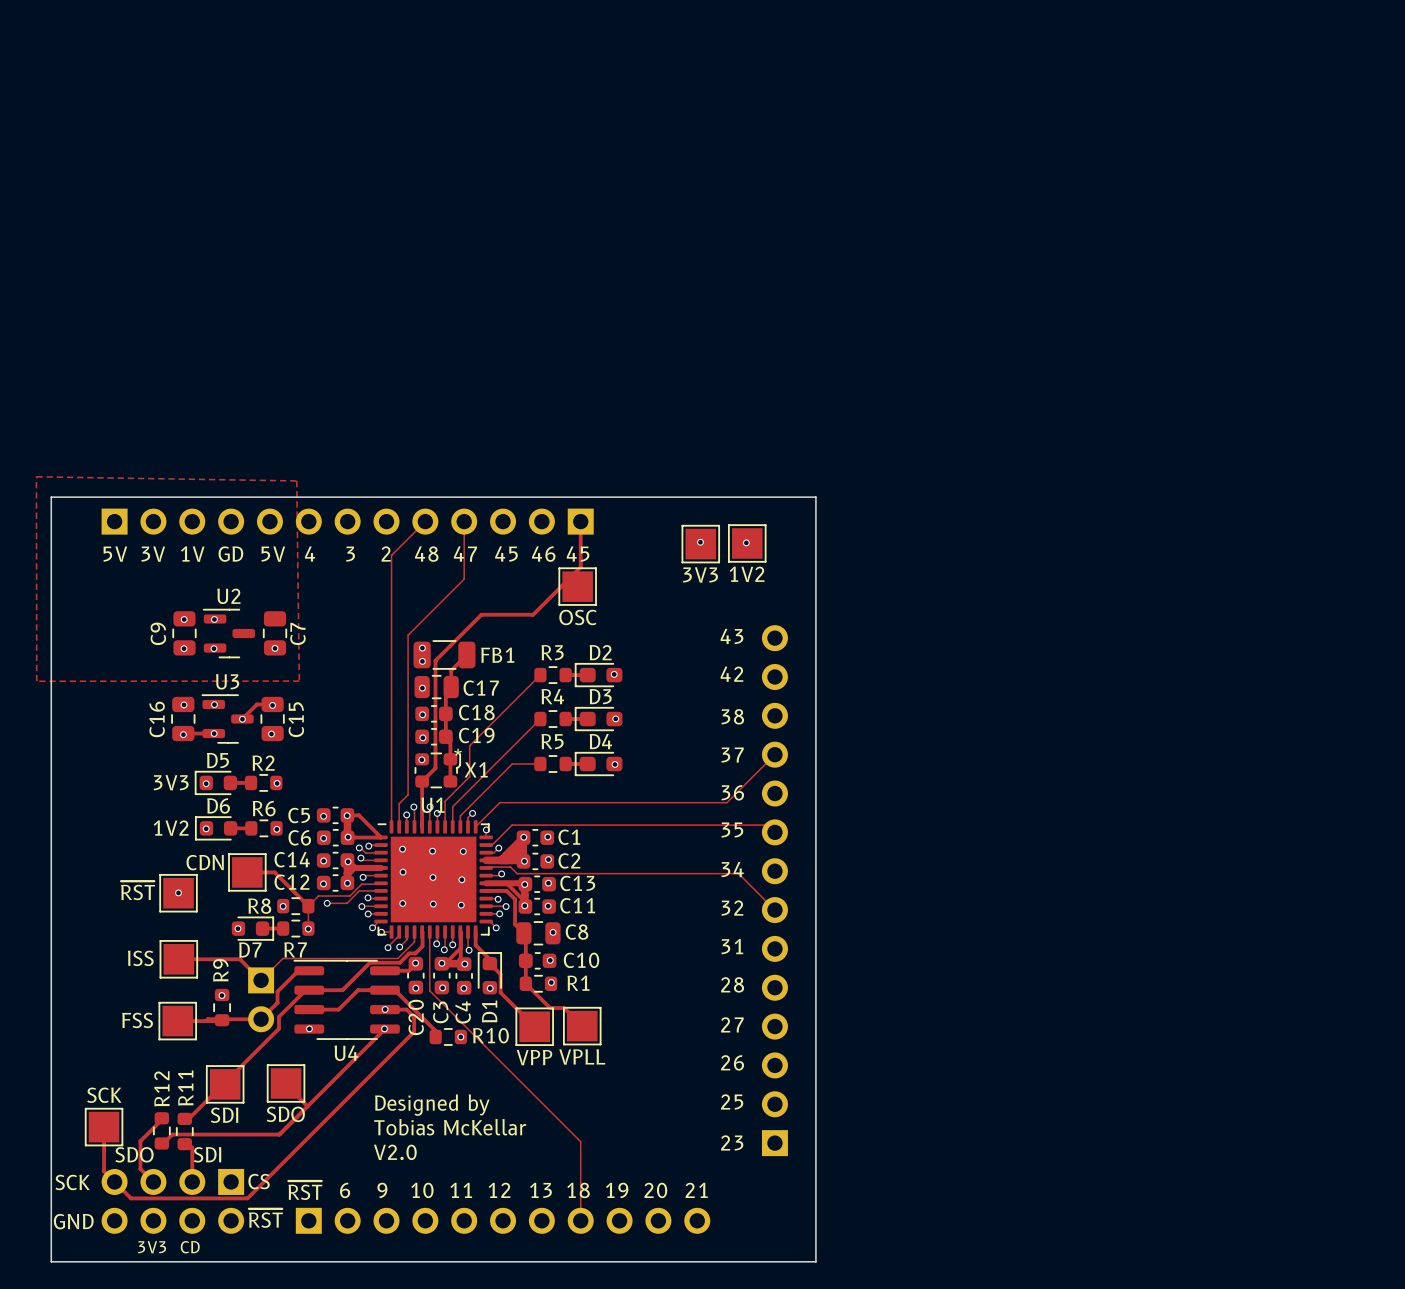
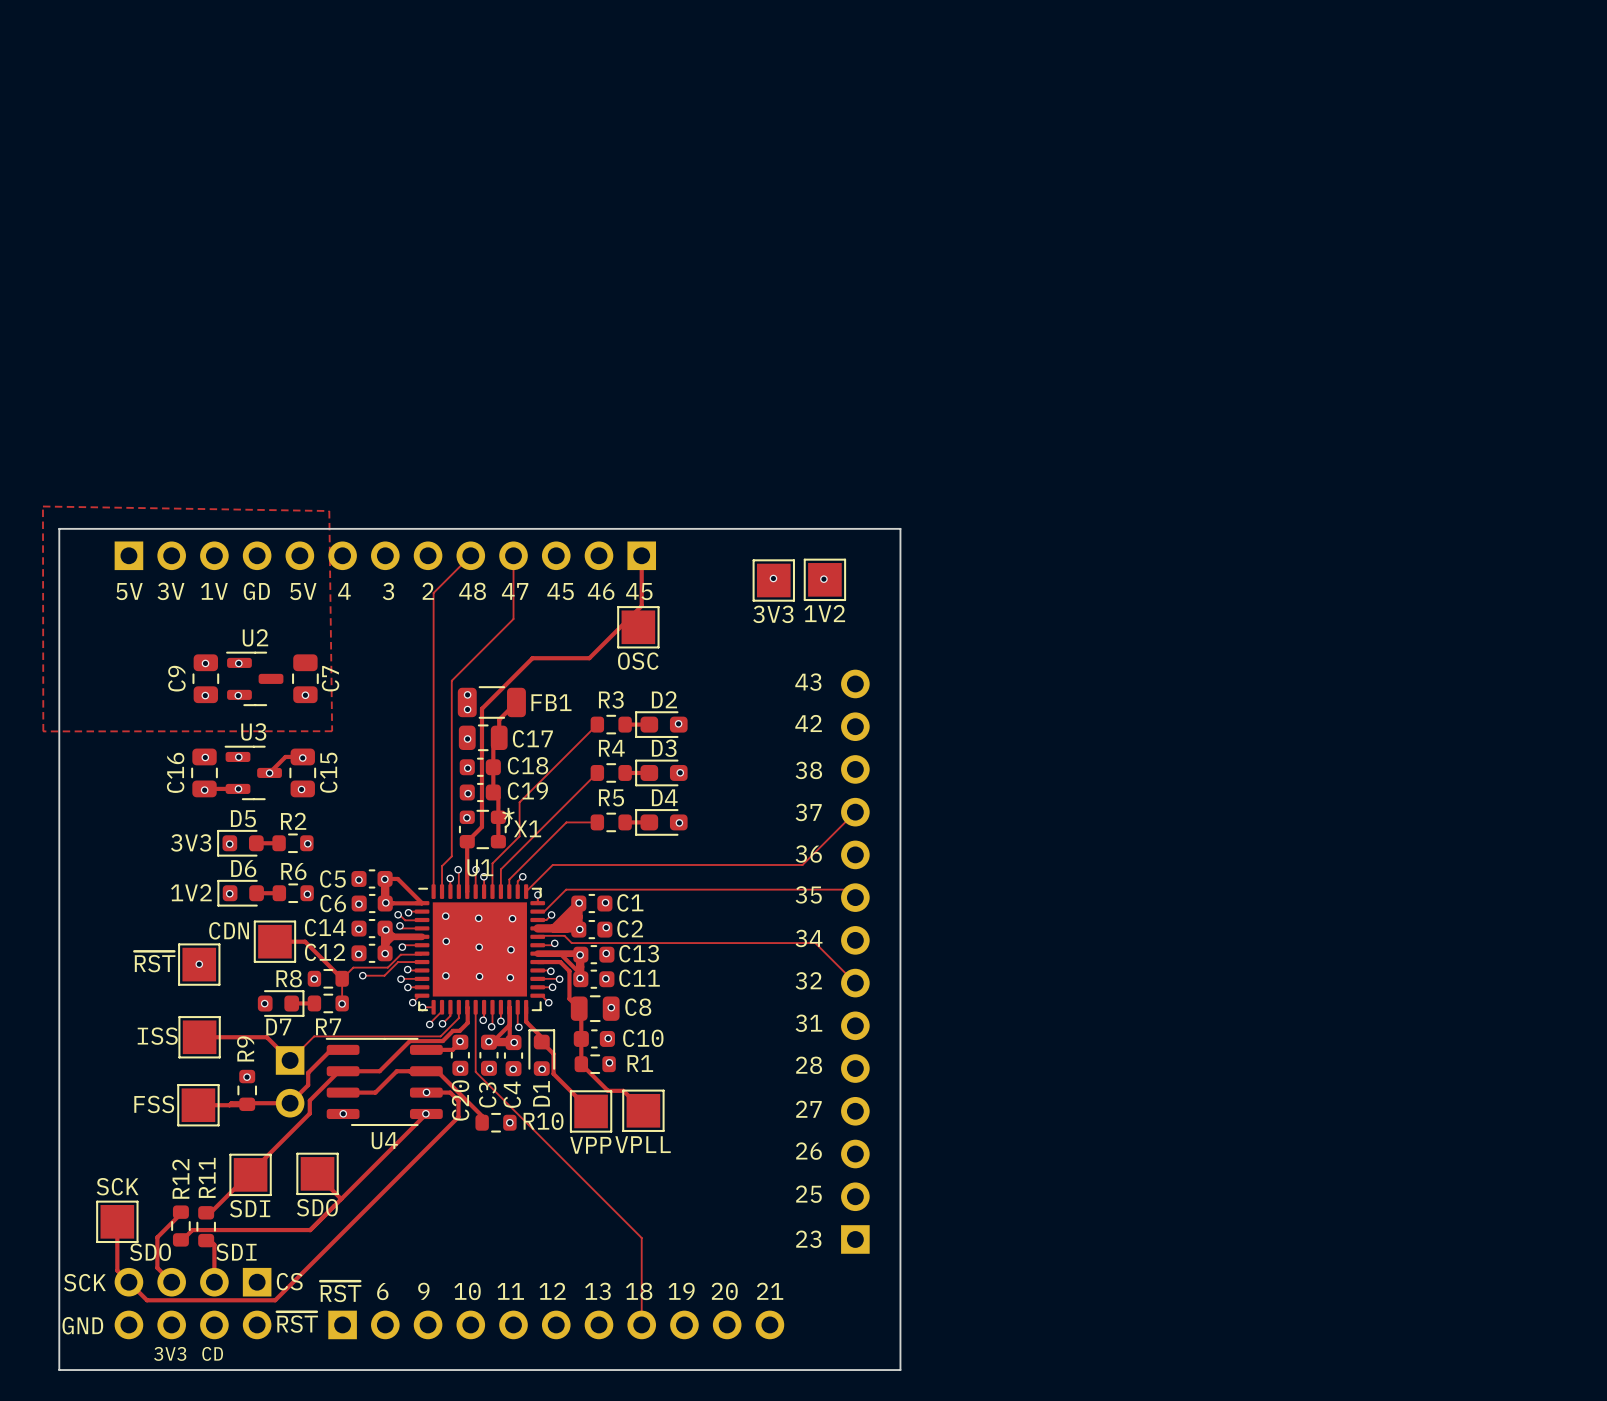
text: Designed by (432, 1105) -> none
text: Tobias McKellar (450, 1127) -> none
text: V2.0 (395, 1152) -> none

